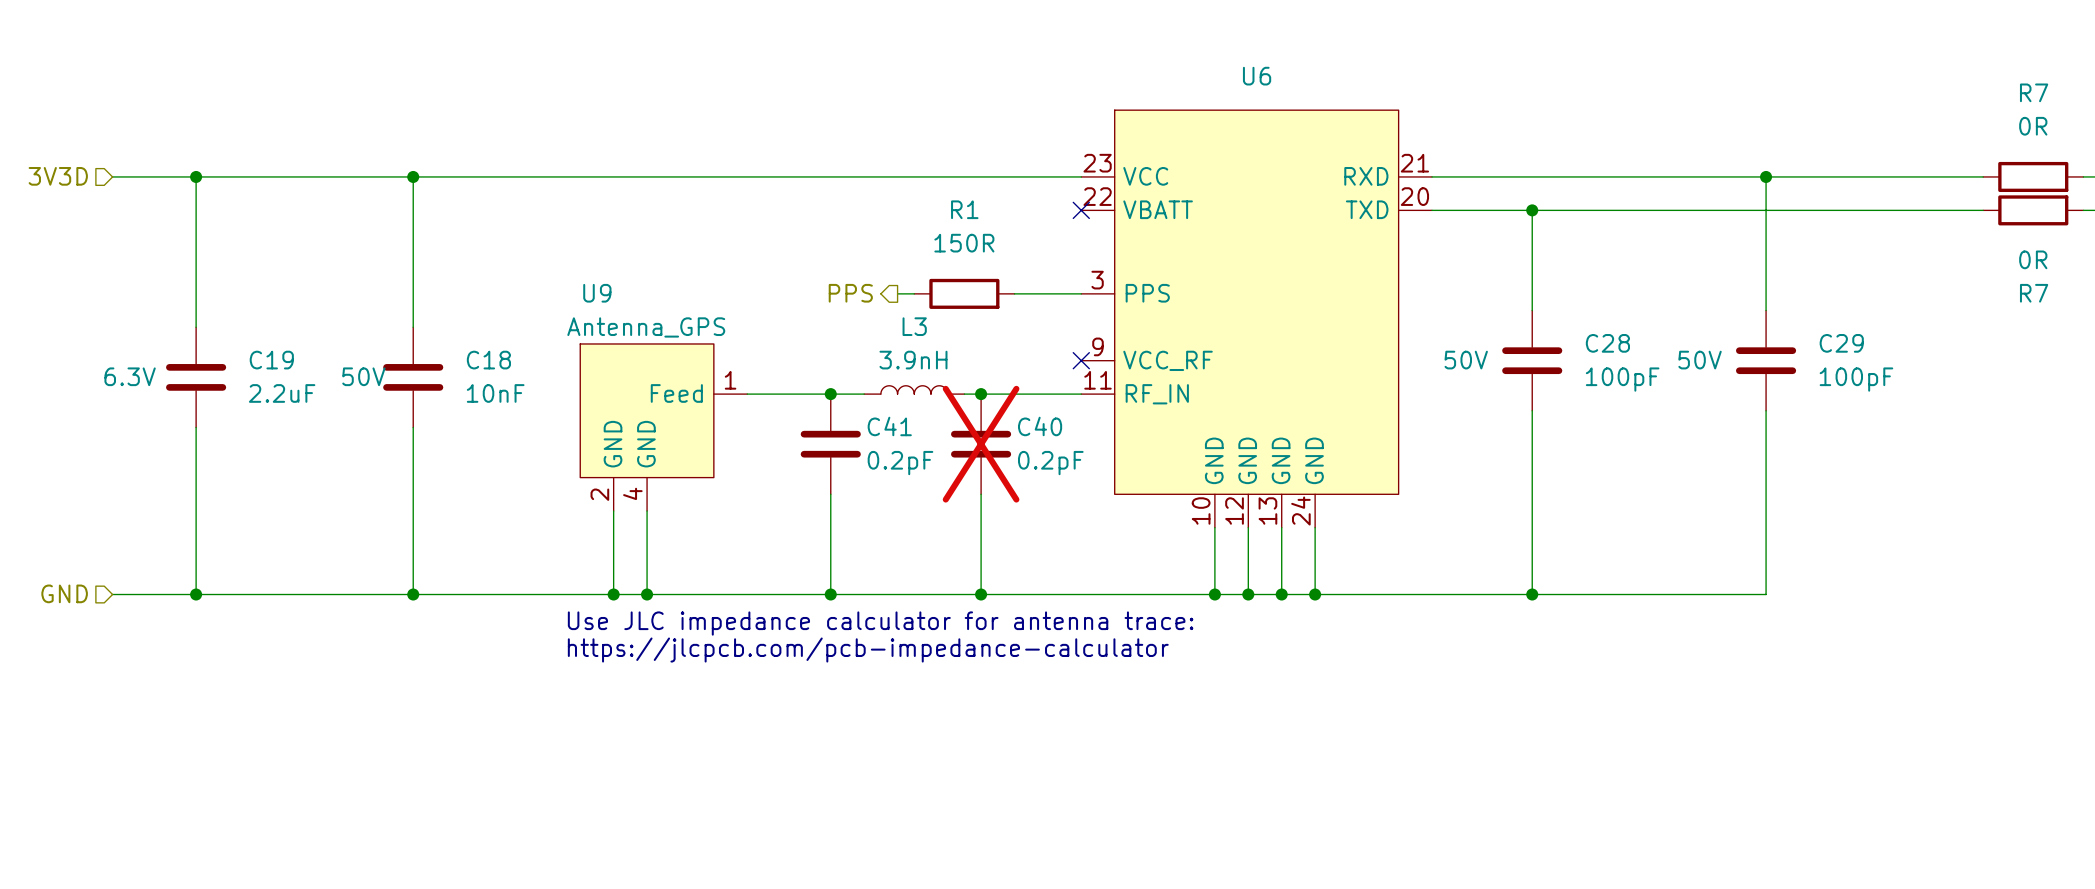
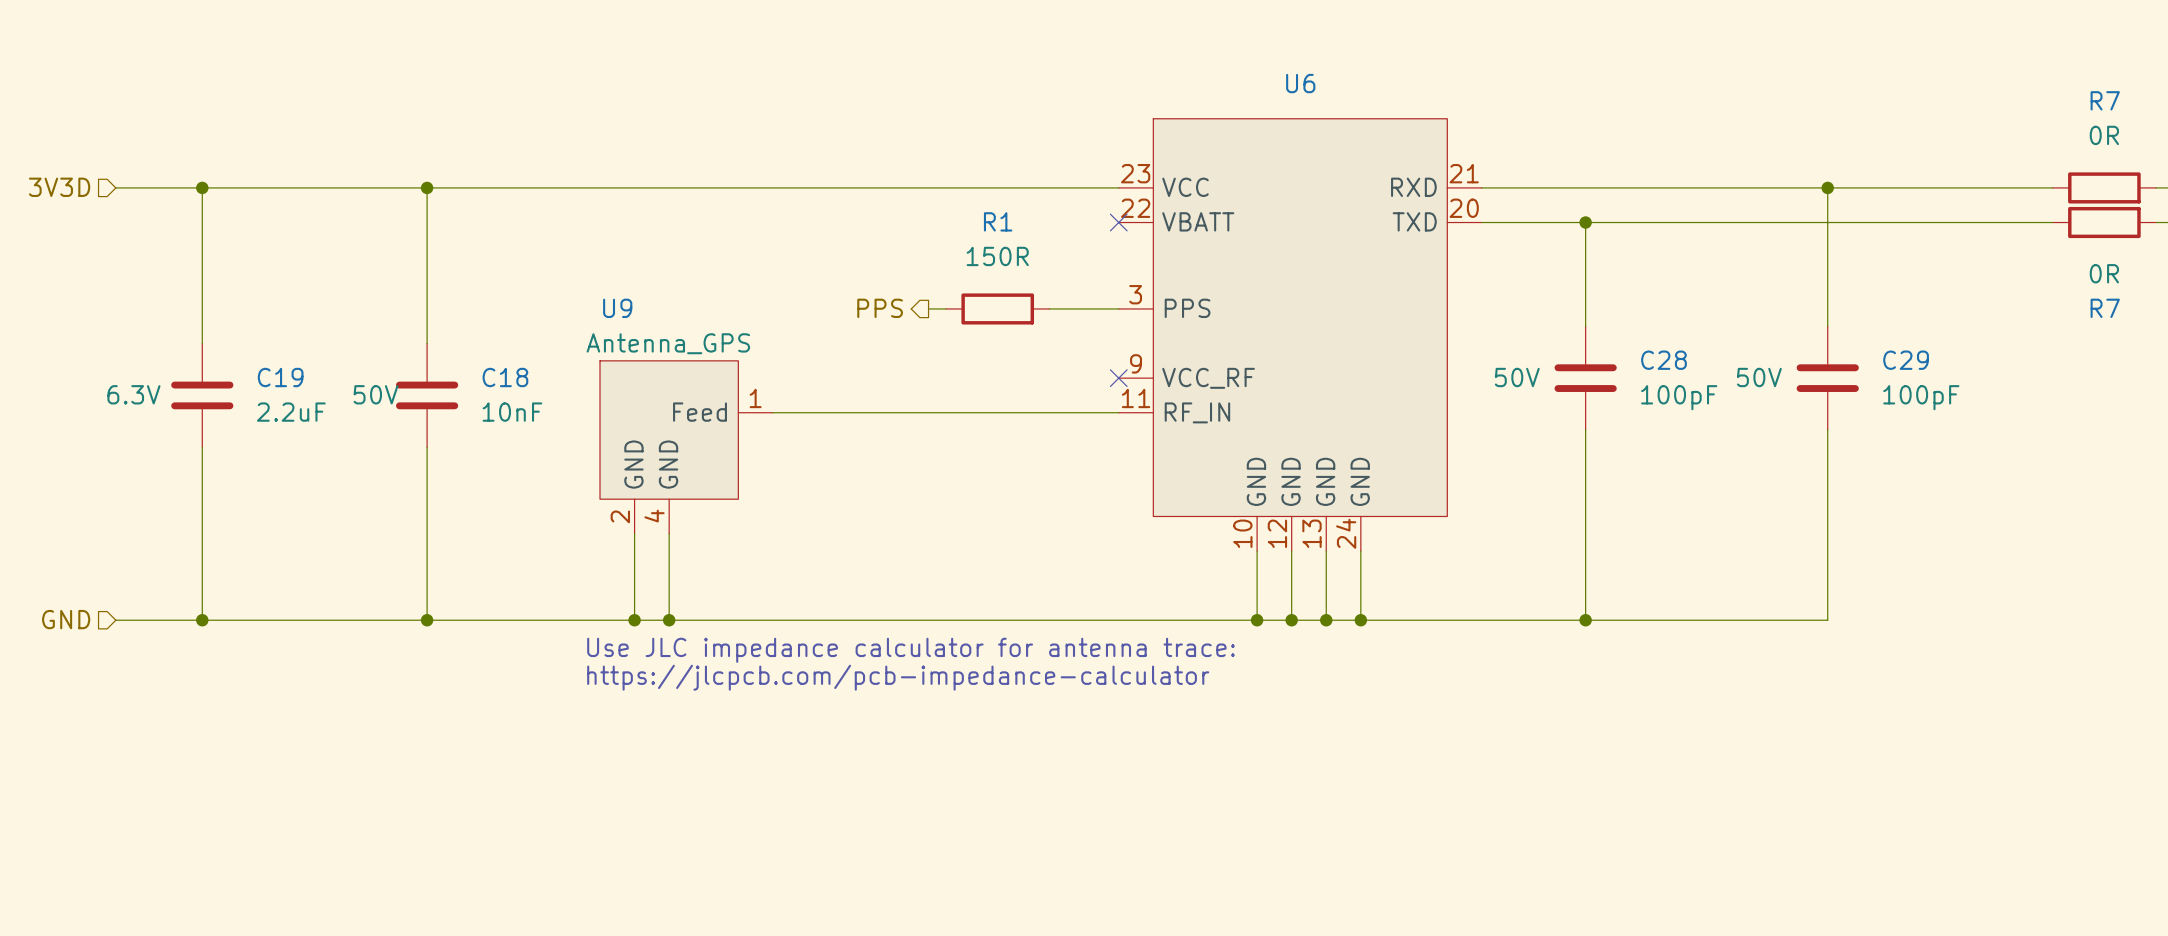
L3: 3.9nH (914, 389) -> none
junction: (830, 394) -> none
wire: none -> (893, 412) (997, 412)
junction: (981, 394) -> none
C41: 0.2pF (830, 444) -> none
C40: 0.2pF (981, 444) -> none
wire: (830, 494) (830, 594) -> none
wire: (981, 494) (981, 594) -> none
junction: (830, 594) -> none
junction: (981, 594) -> none

